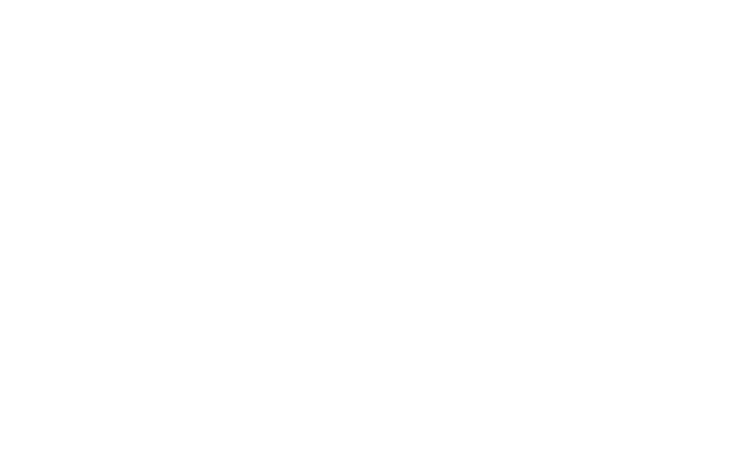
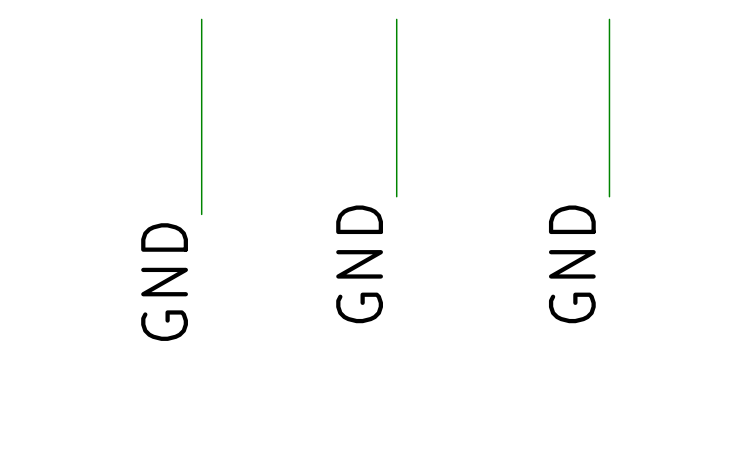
wire: none -> (201, 19) (201, 214)
wire: none -> (396, 19) (396, 196)
wire: none -> (609, 19) (609, 196)
label: none -> GND (359, 264)
label: none -> GND (572, 264)
label: none -> GND (164, 282)

